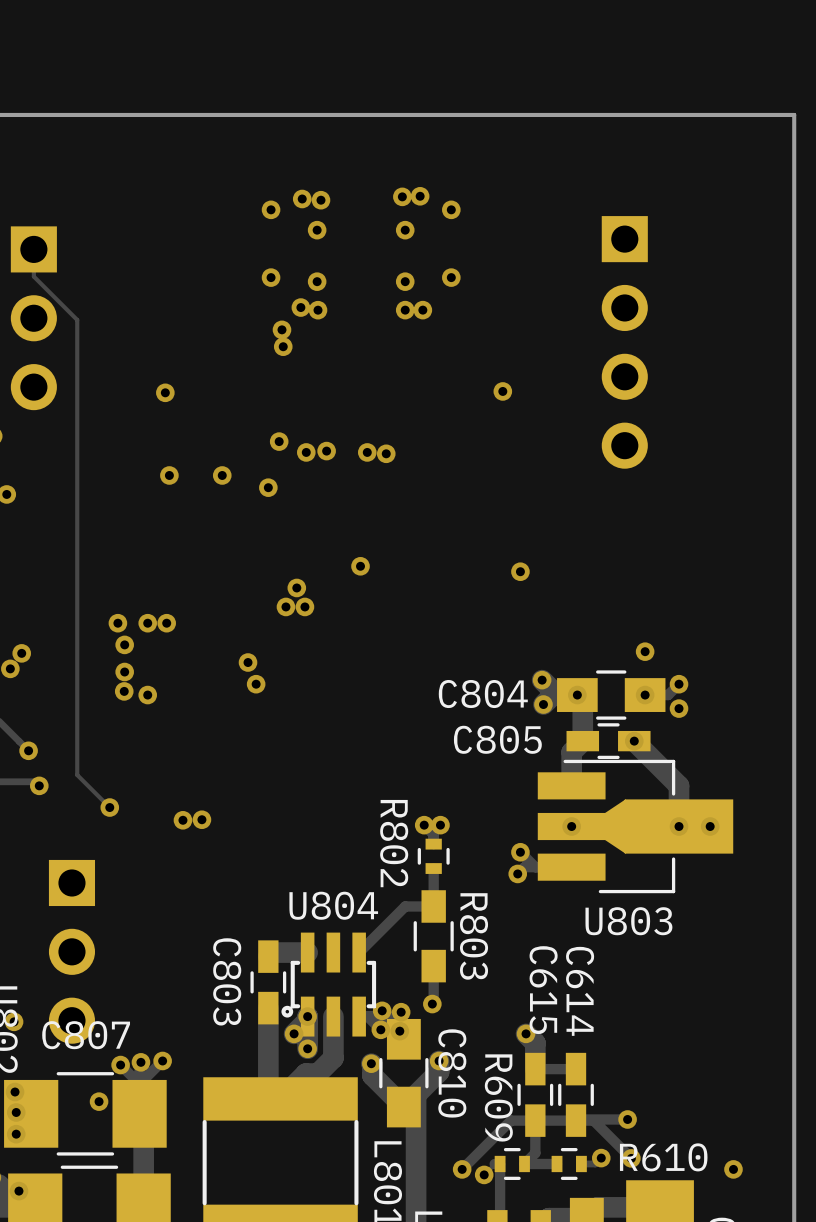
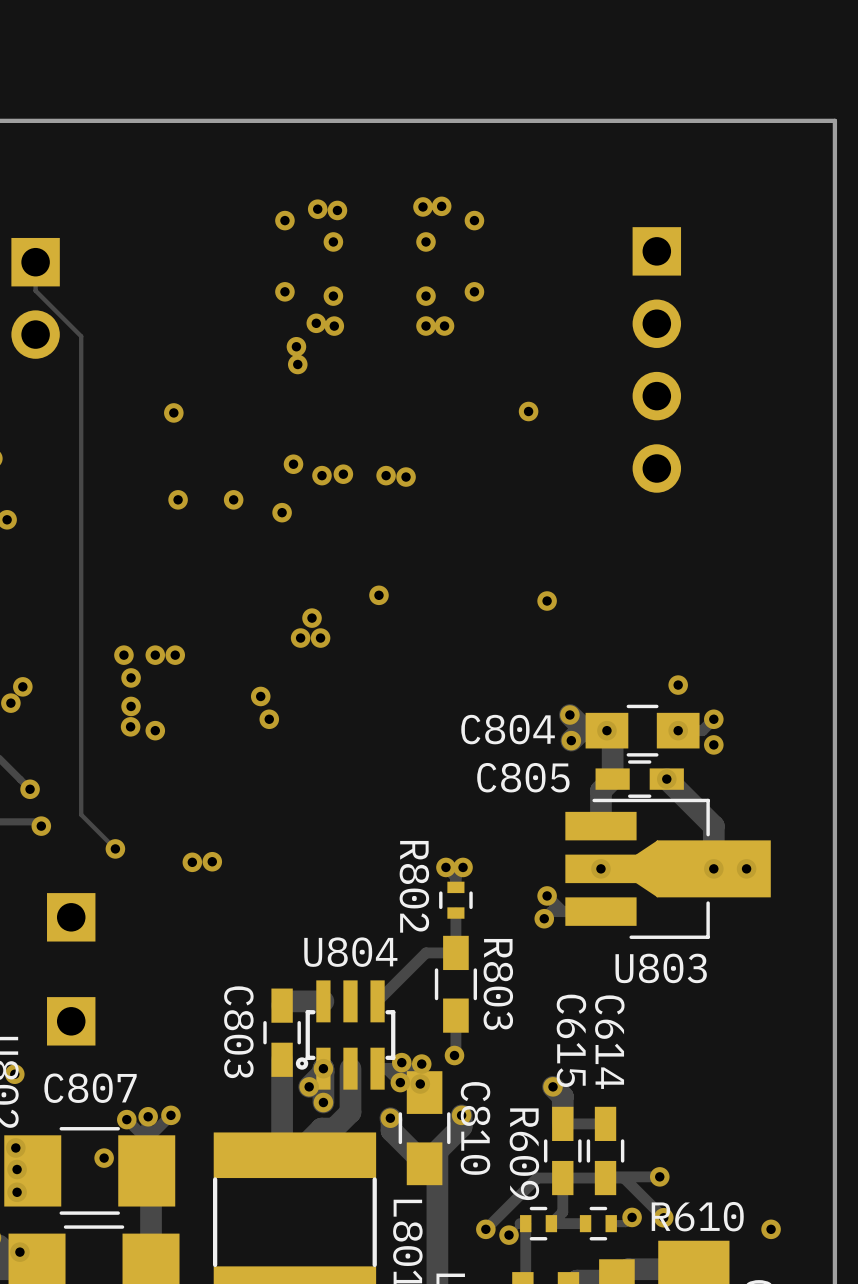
part: (33, 318) -> none
part footprint: [48, 859, 96, 1044] -> [47, 997, 96, 1046]
part: none -> (71, 917)

